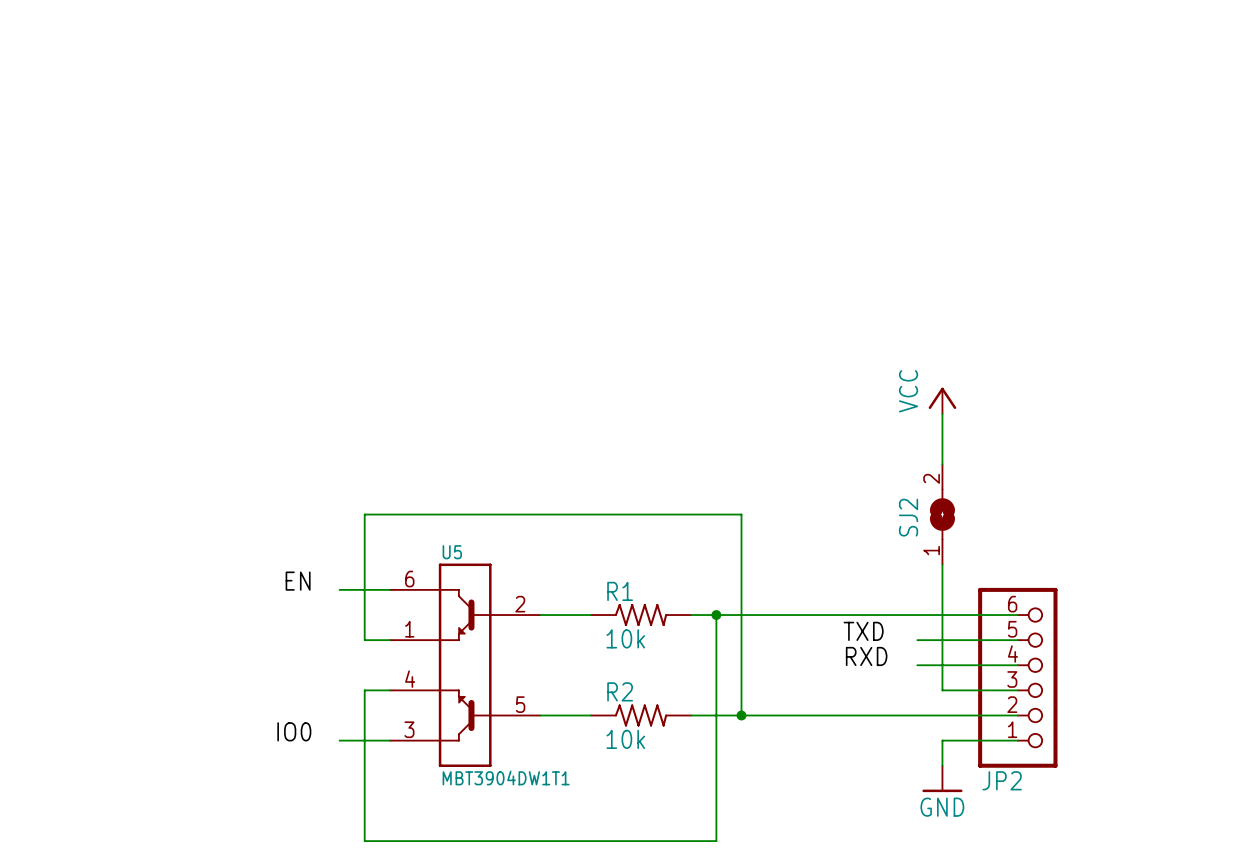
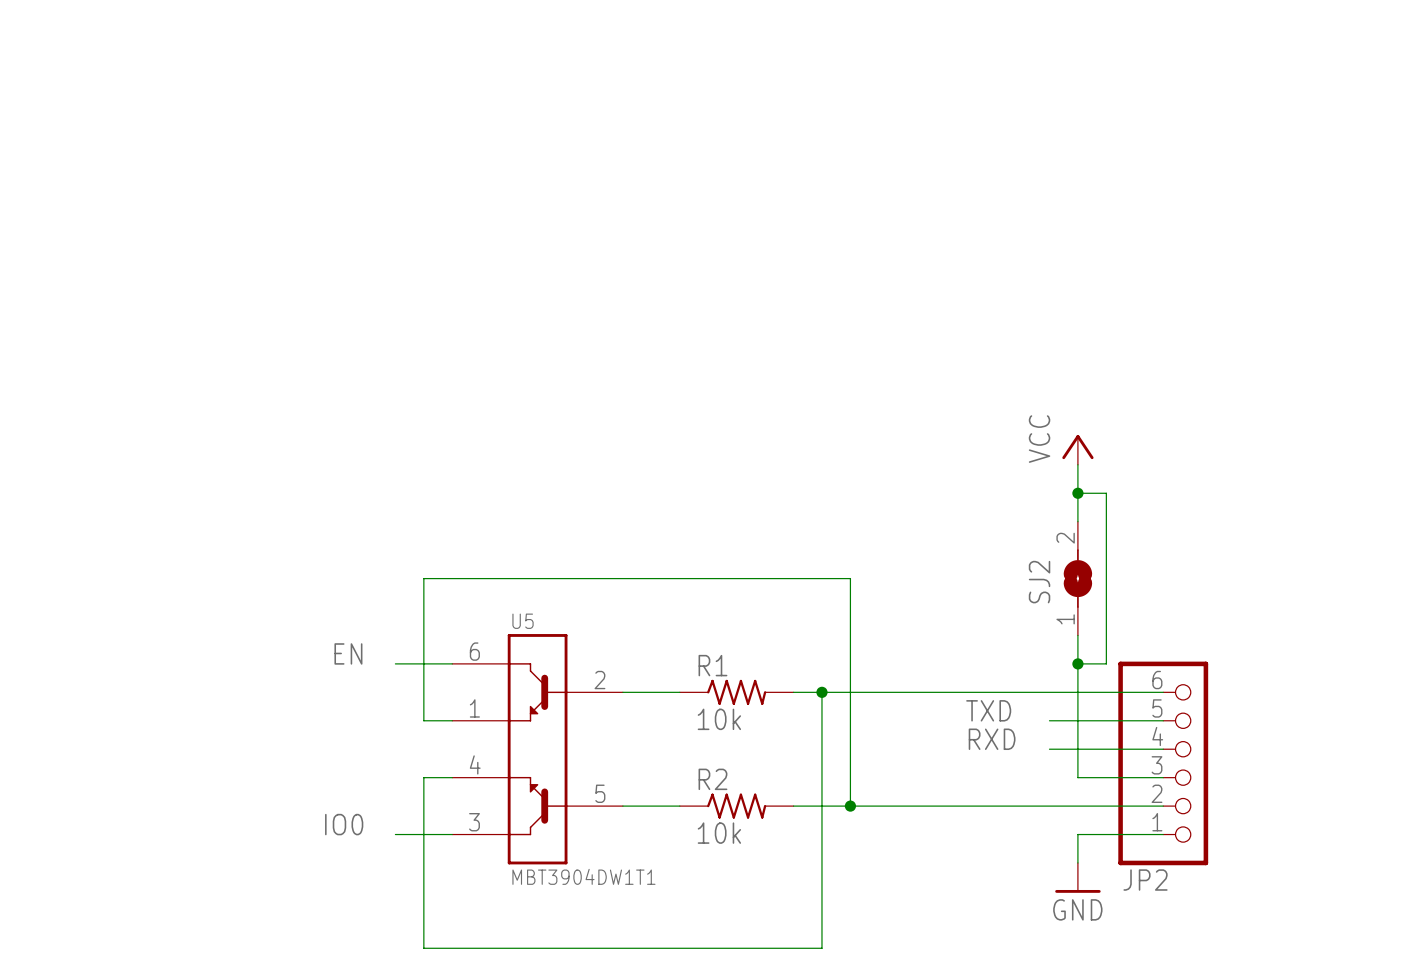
wire: none -> (1077, 493) (1106, 493) (1106, 663) (1077, 663)
junction: none -> (1077, 493)
junction: none -> (1077, 663)

